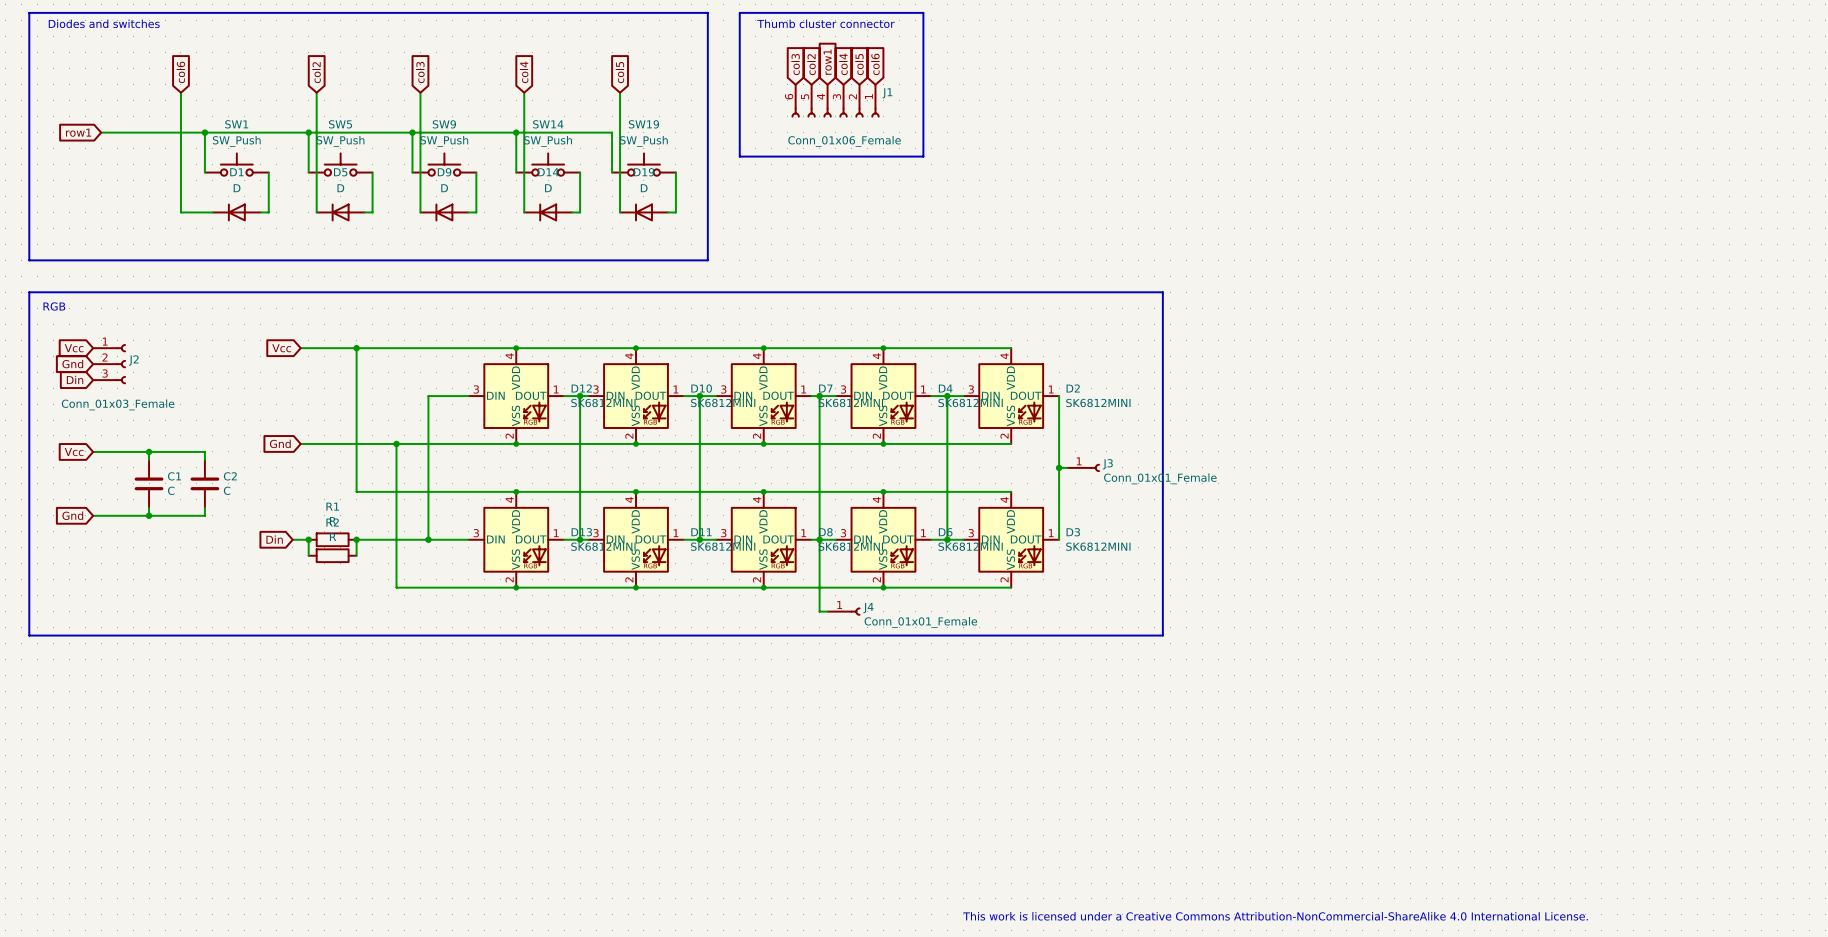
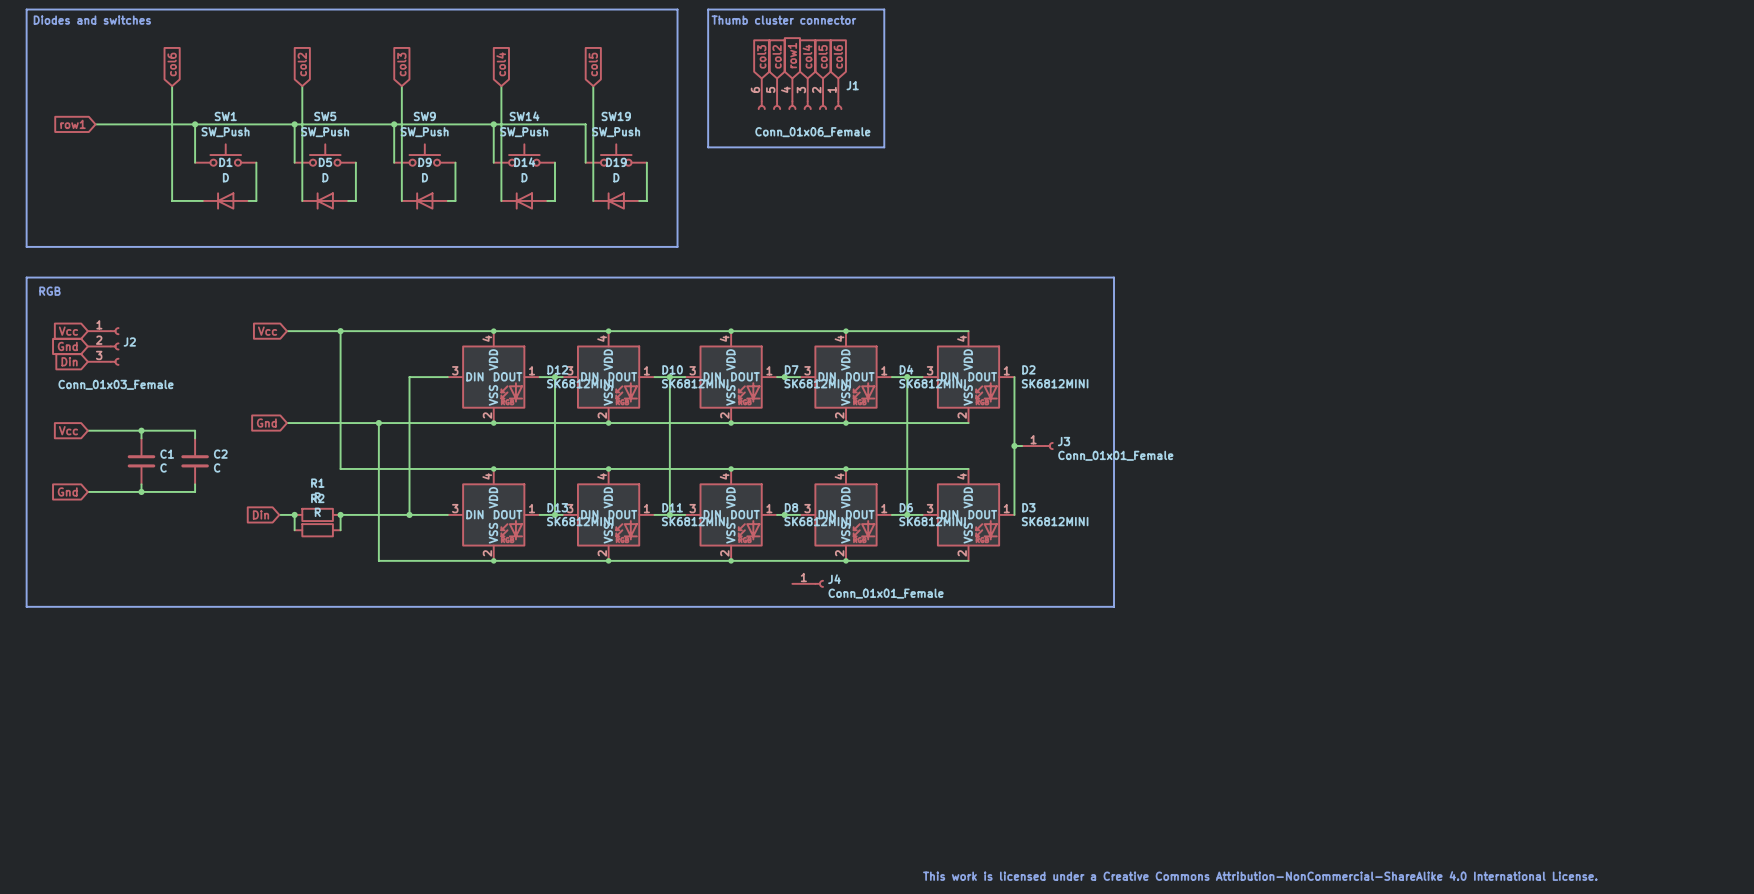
wire: (819, 396) (819, 611) (827, 611) -> none

